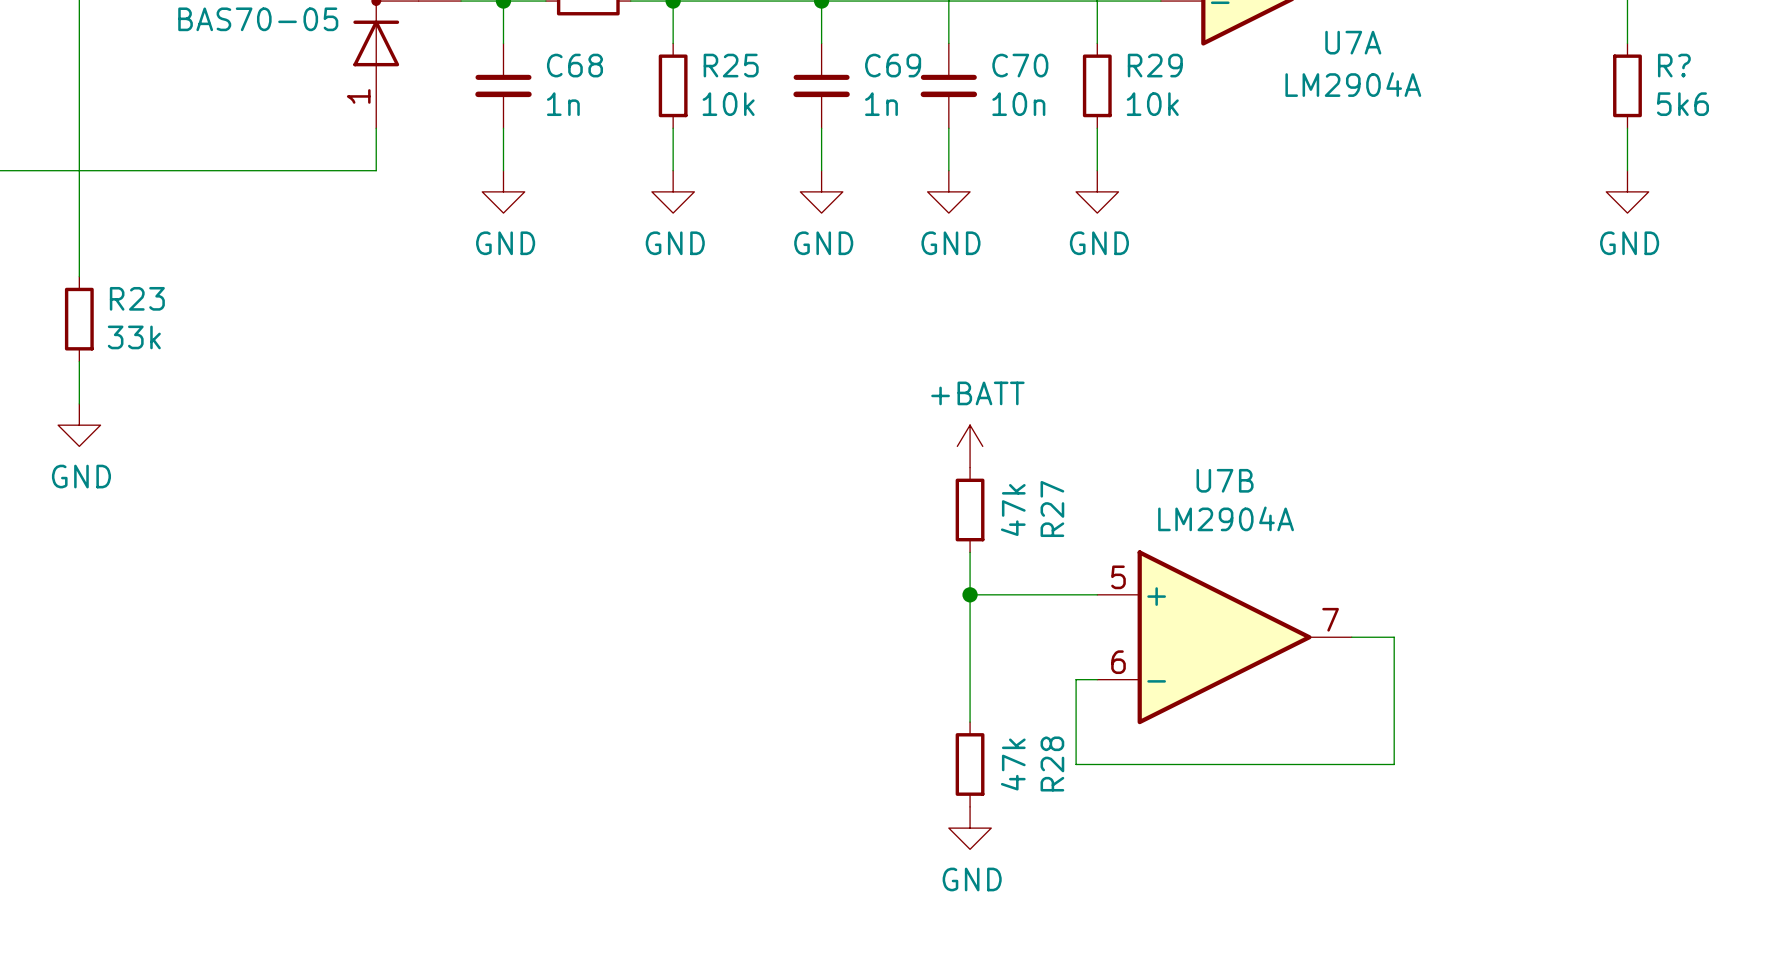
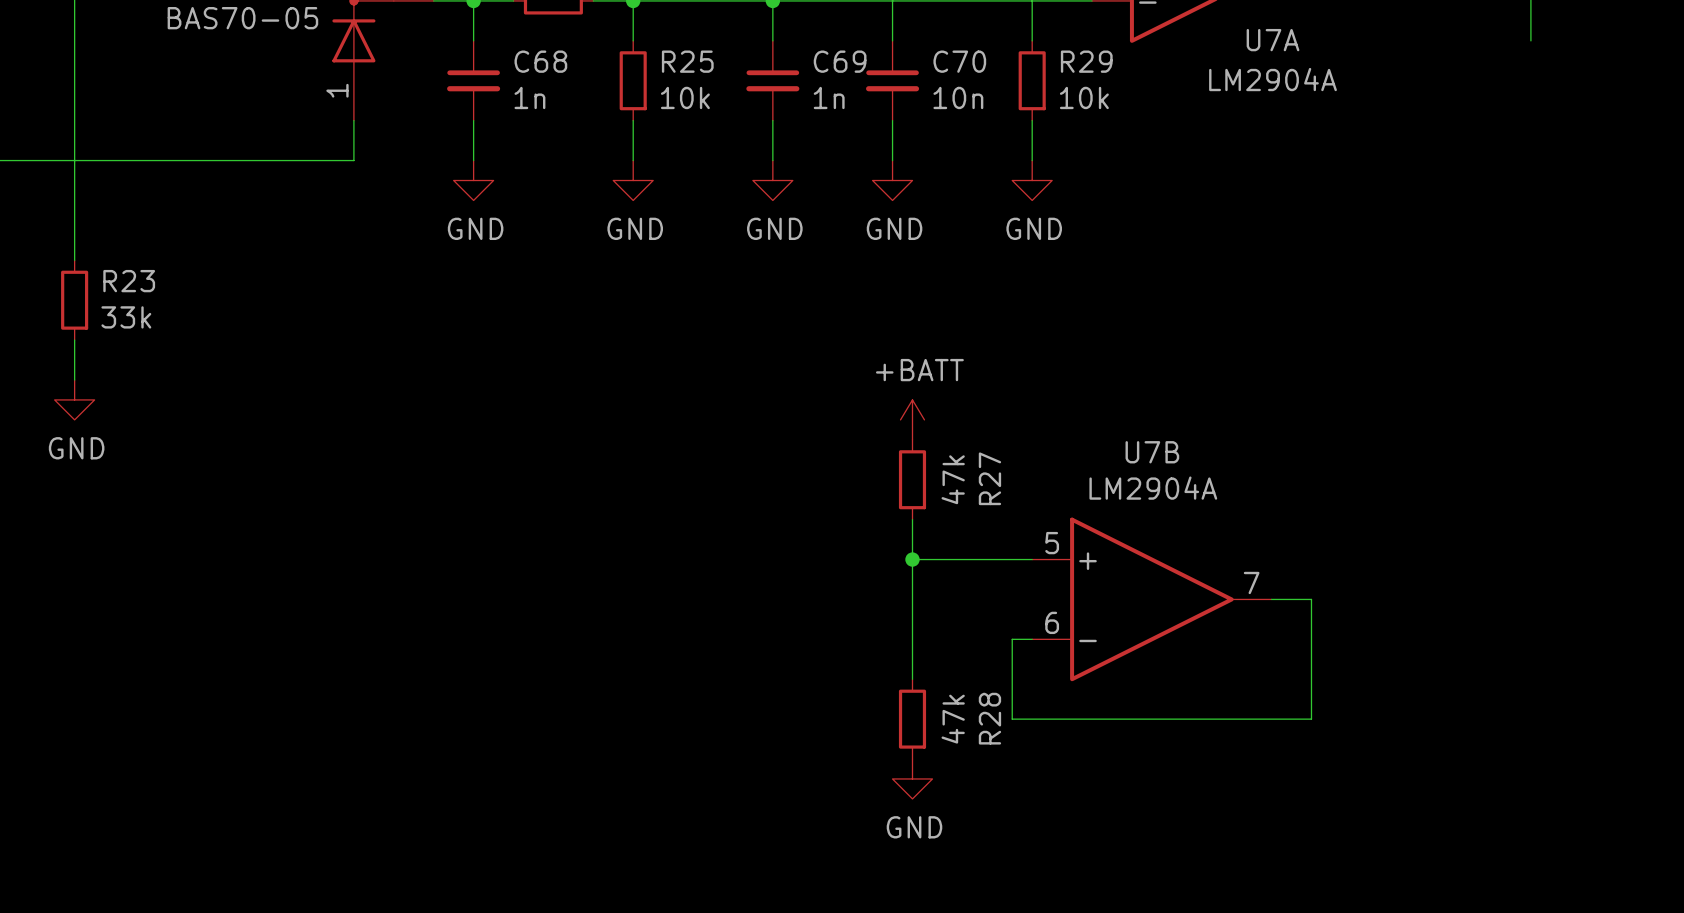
R?: 5k6 (1627, 85) -> none
wire: (1627, 128) (1627, 170) -> none
power symbol: GND (1627, 191) -> none

